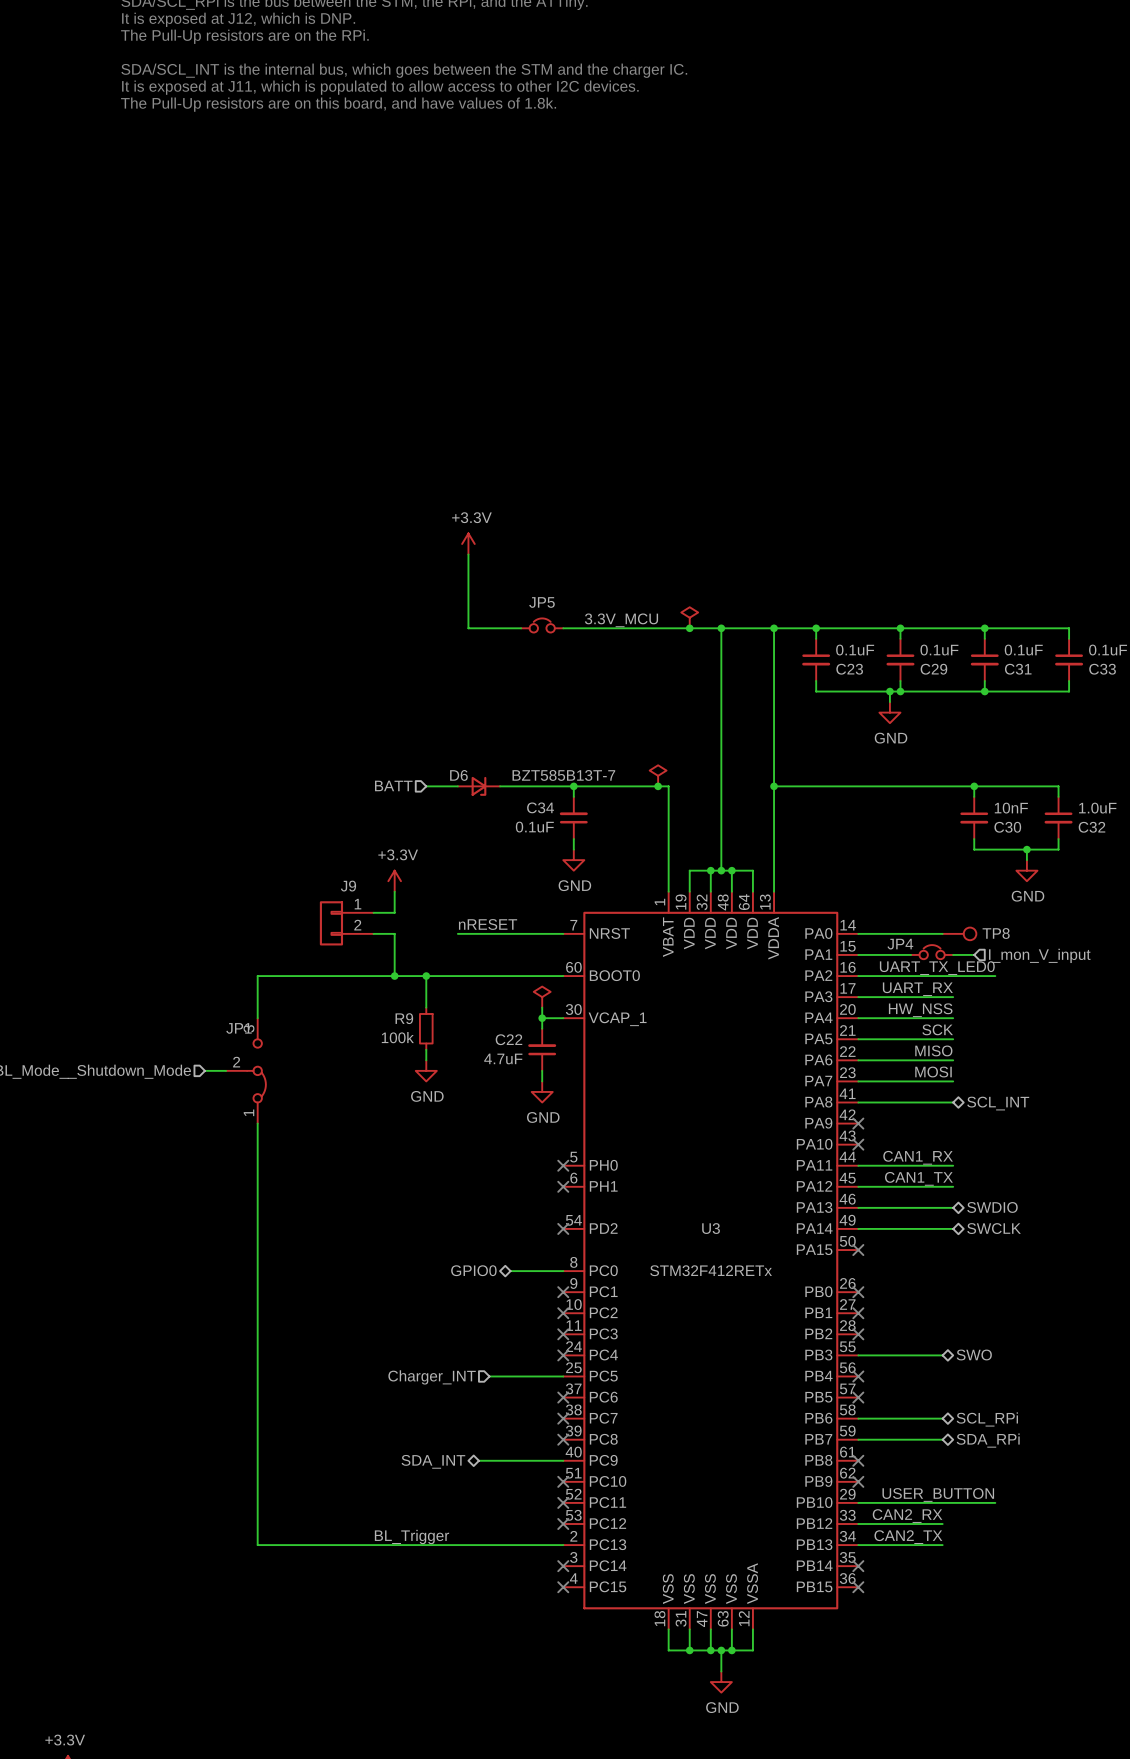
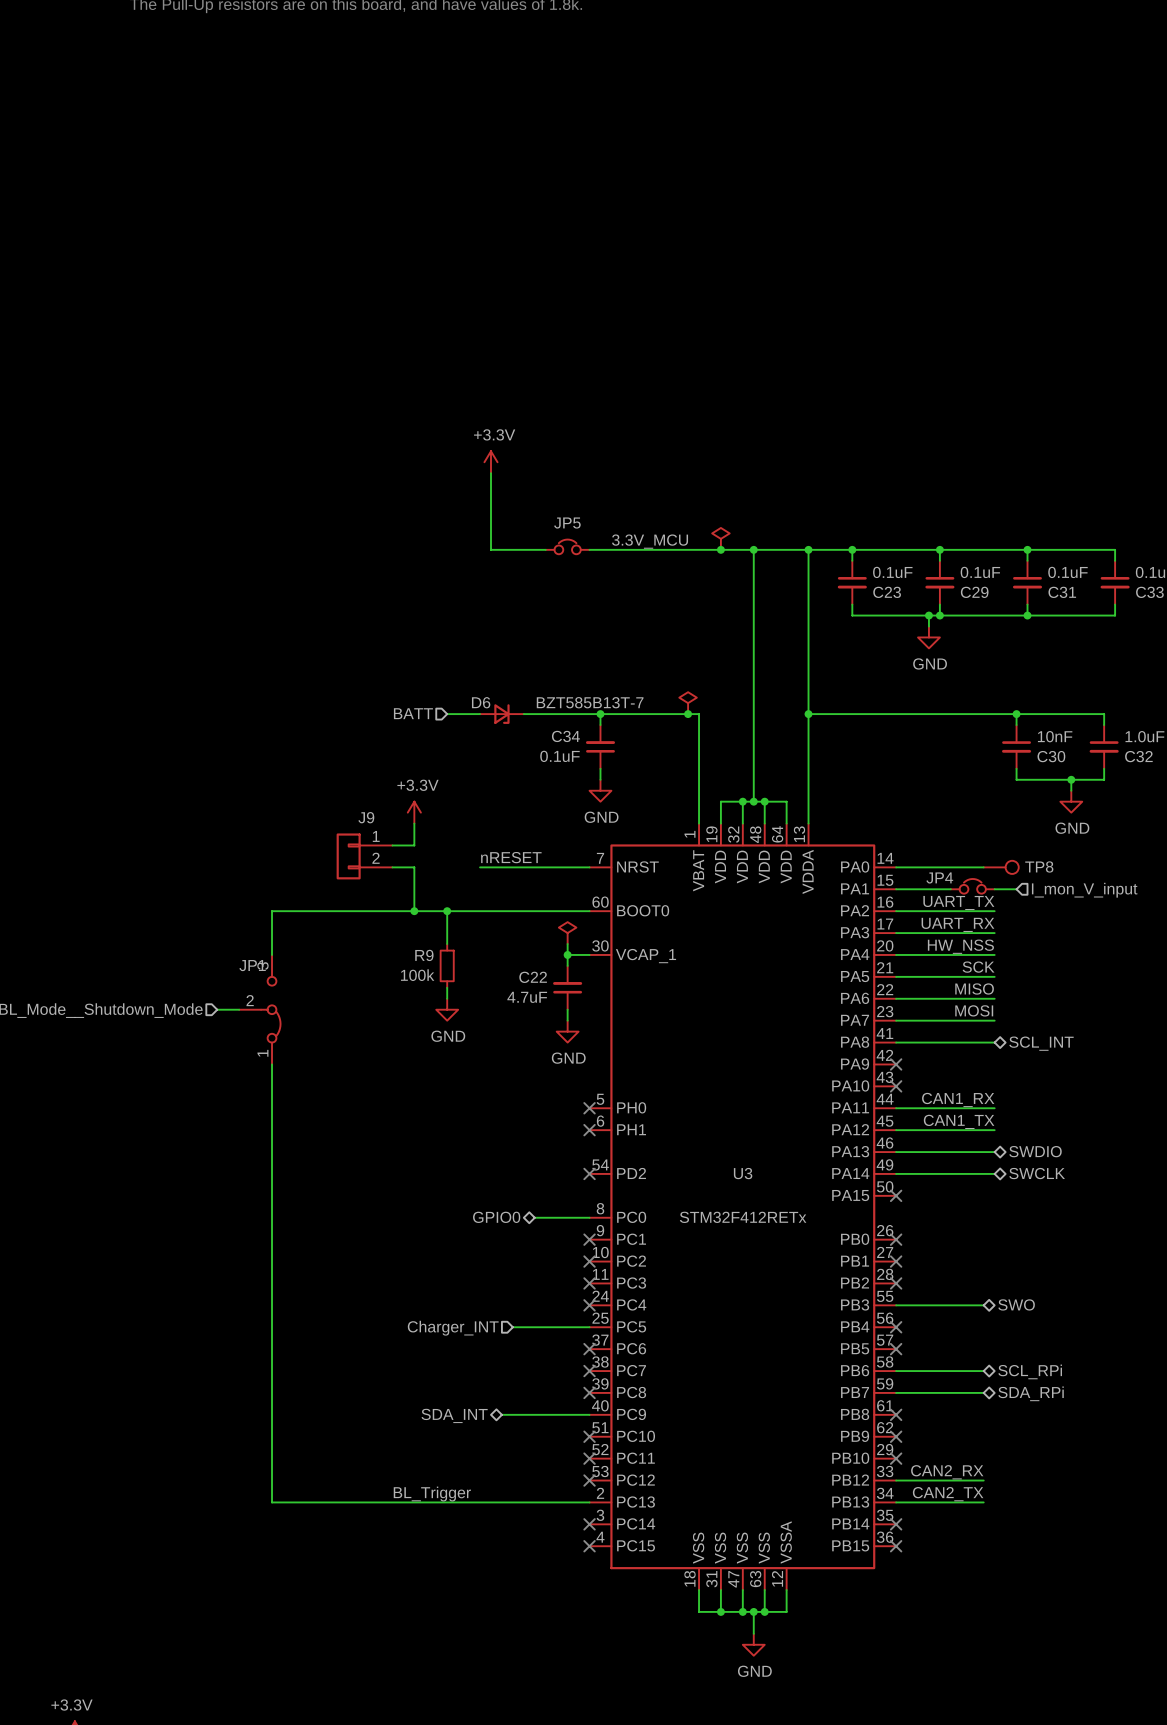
label: UART_TX_LED0 (937, 968) -> UART_TX (958, 902)
wire: (953, 976) (995, 976) -> none
label: USER_BUTTON (938, 1494) -> none
wire: (858, 1502) (995, 1502) -> none
no-connect mark: none -> (896, 1458)

